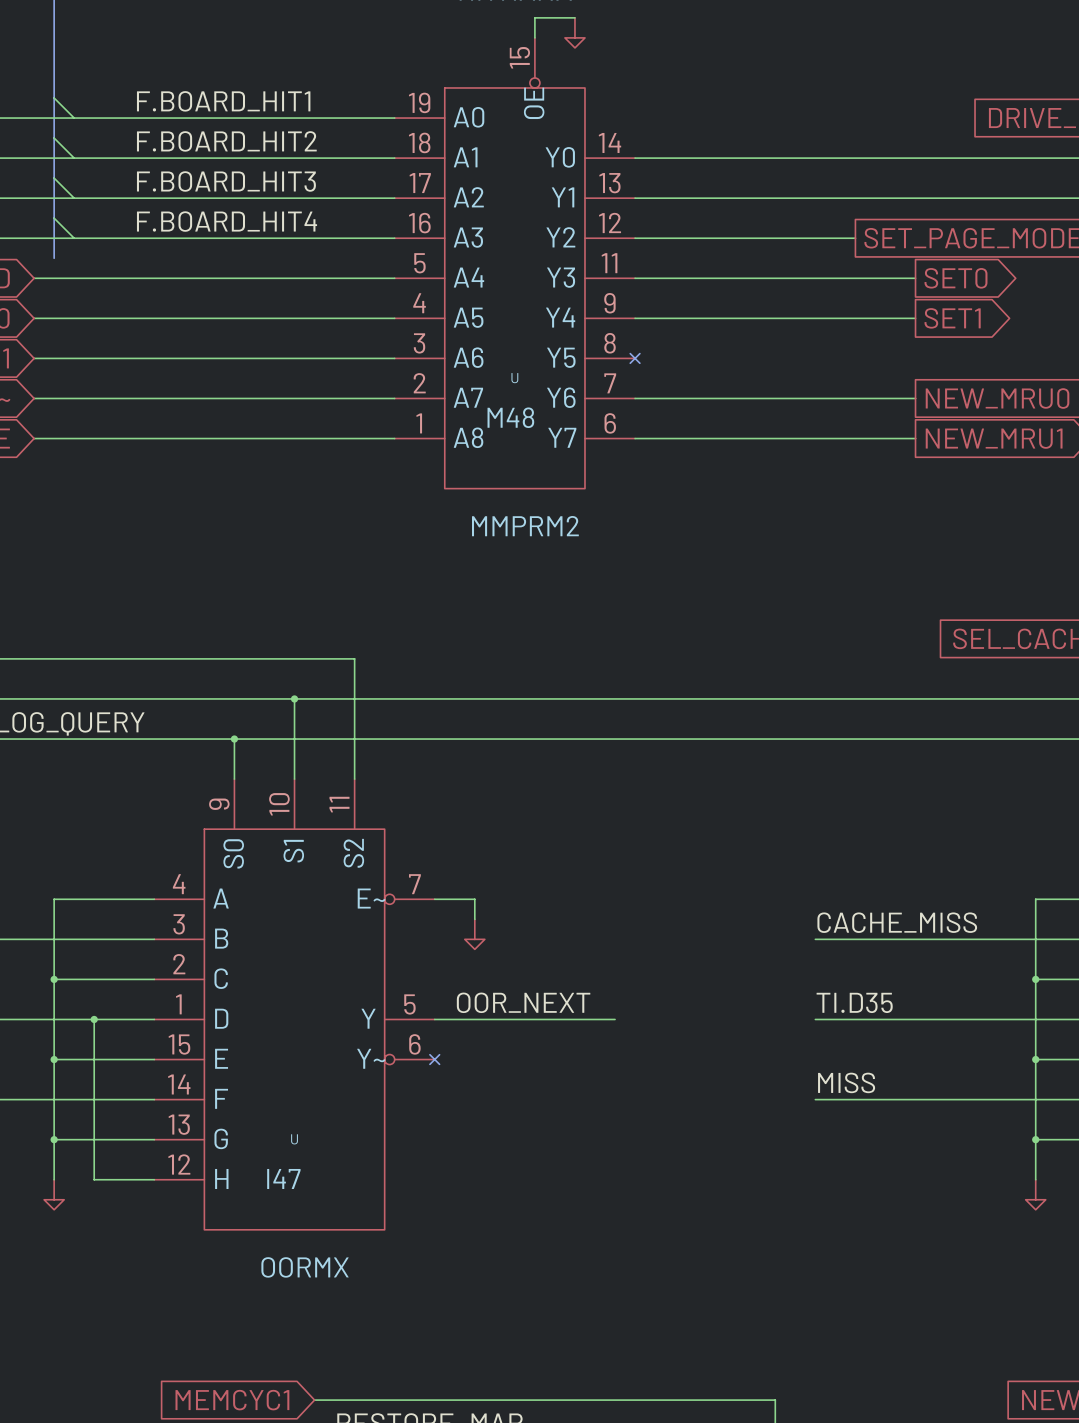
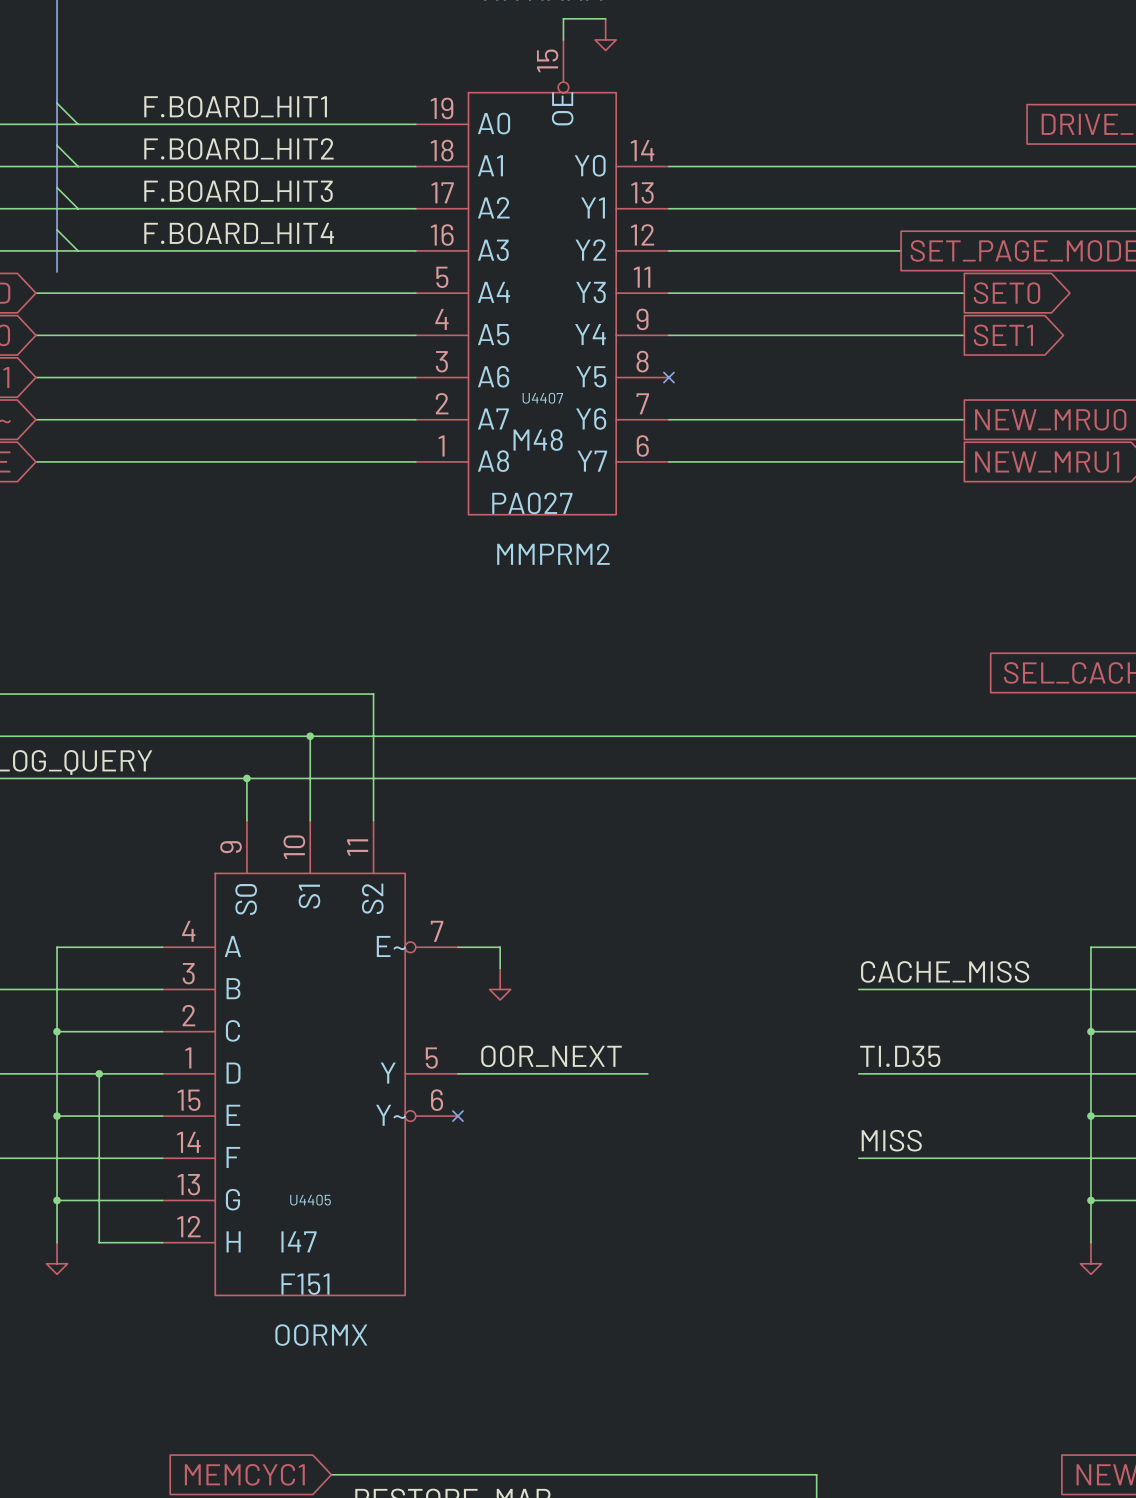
U name: U (514, 378) -> U4407 (542, 398)
U value: none -> PA027 (532, 503)
U name: U (294, 1139) -> U4405 (310, 1200)
U value: none -> F151 (305, 1284)

